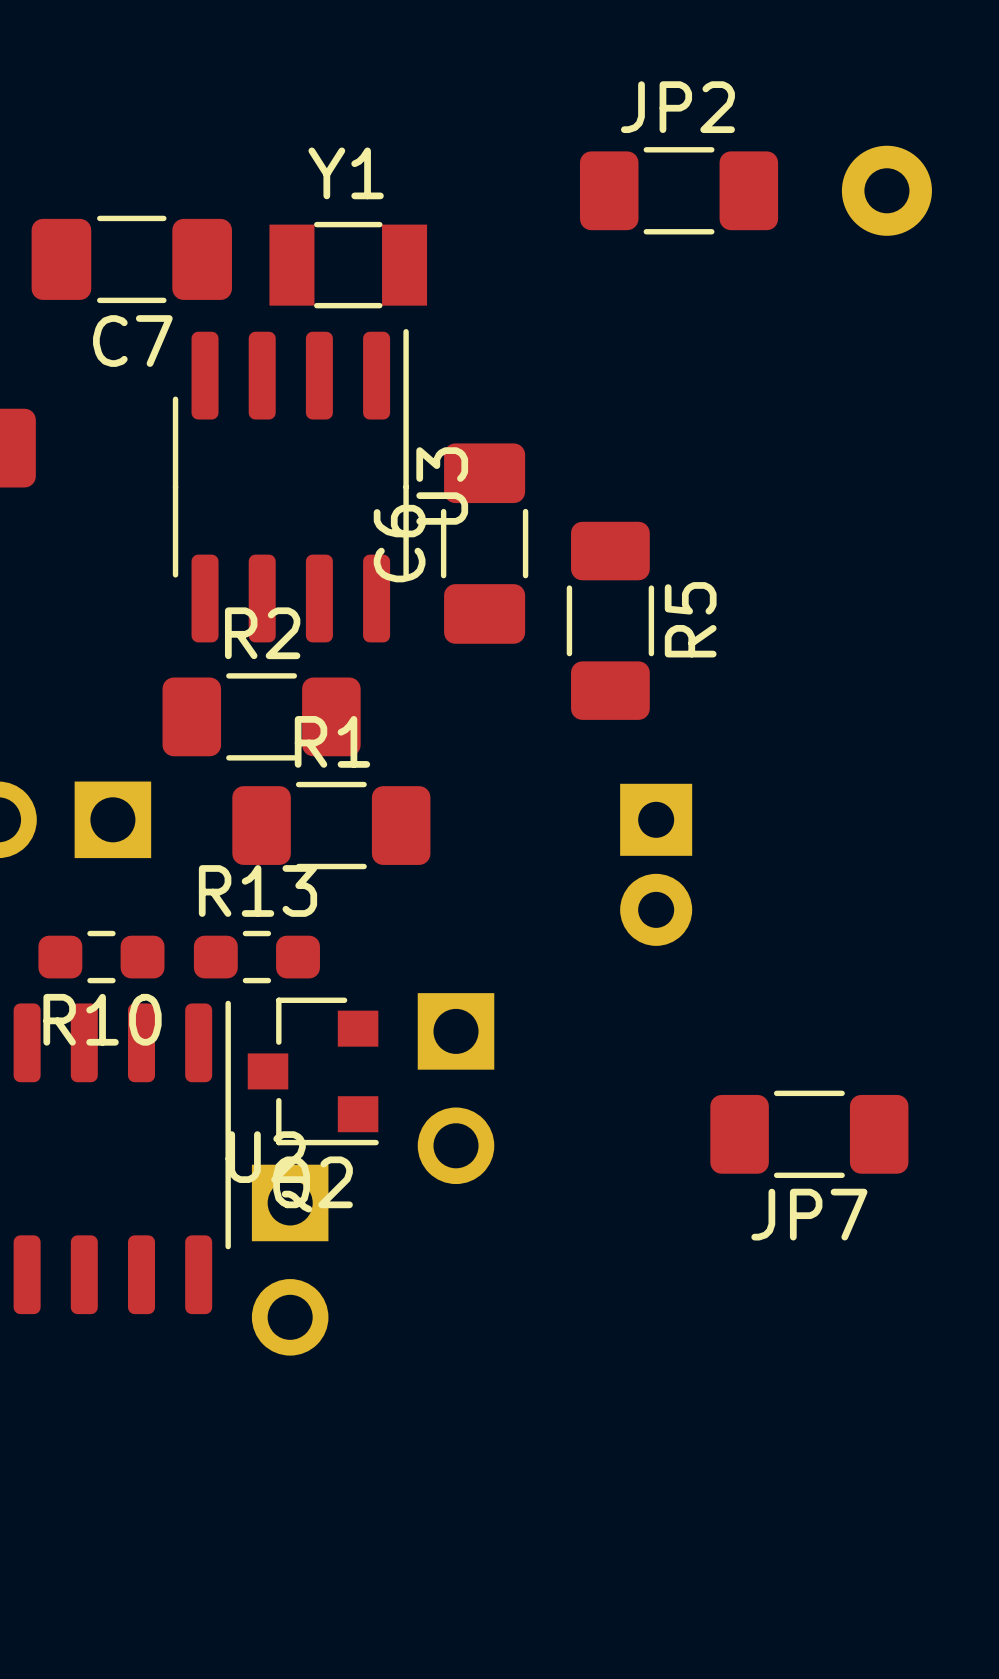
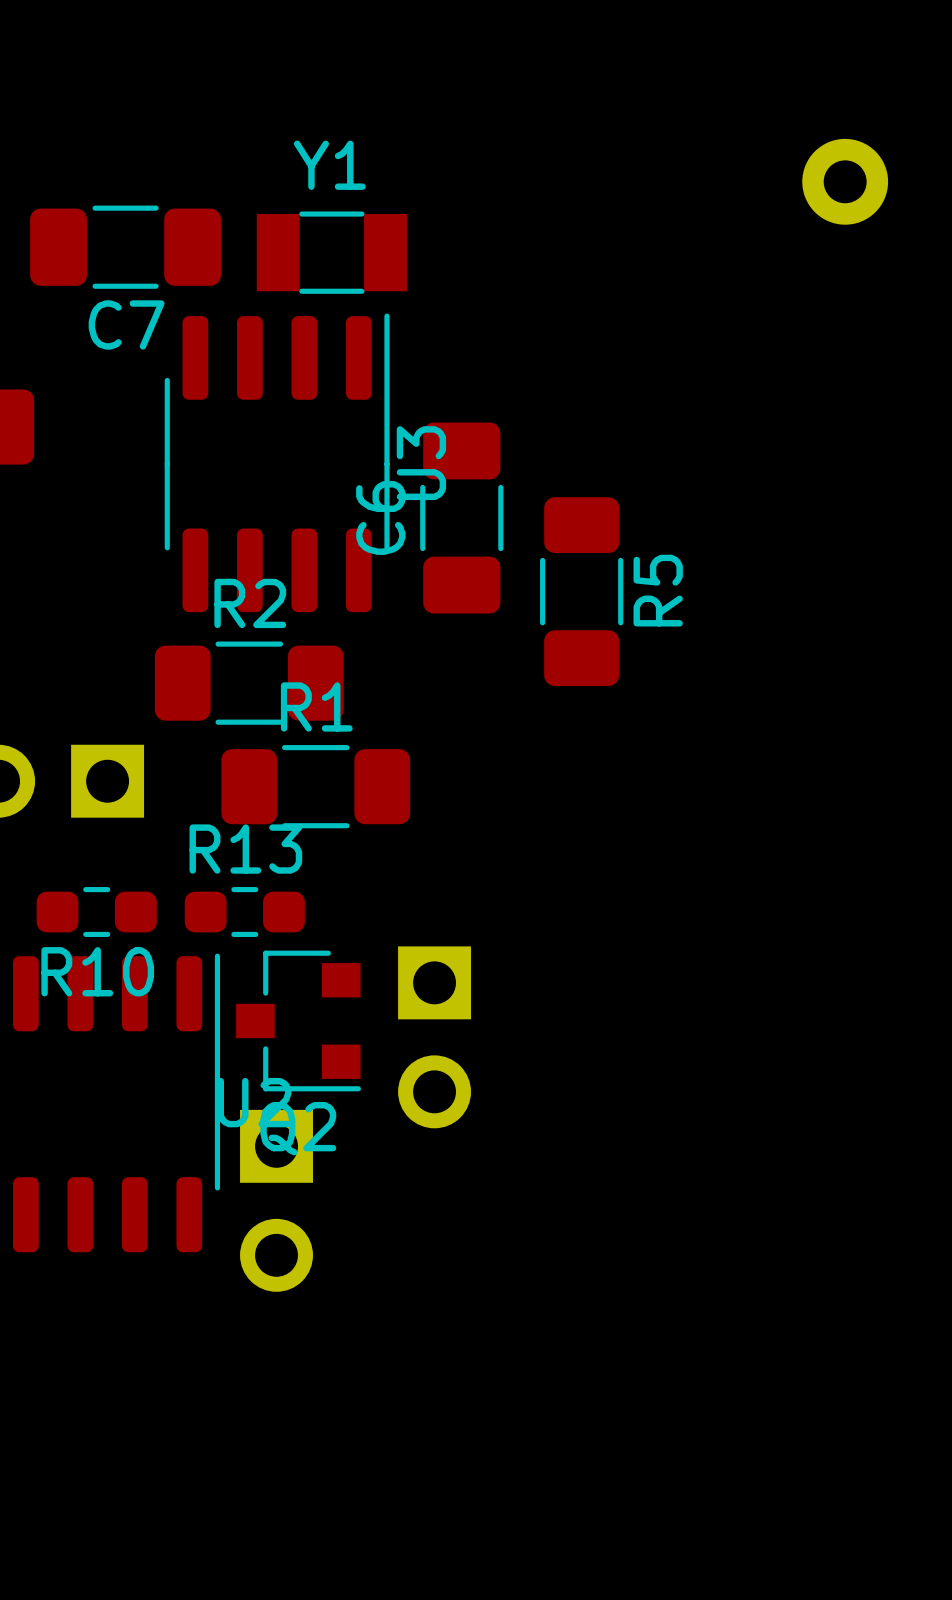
JP2: (679, 190) -> none
part: (656, 864) -> none
JP7: (809, 1134) -> none

